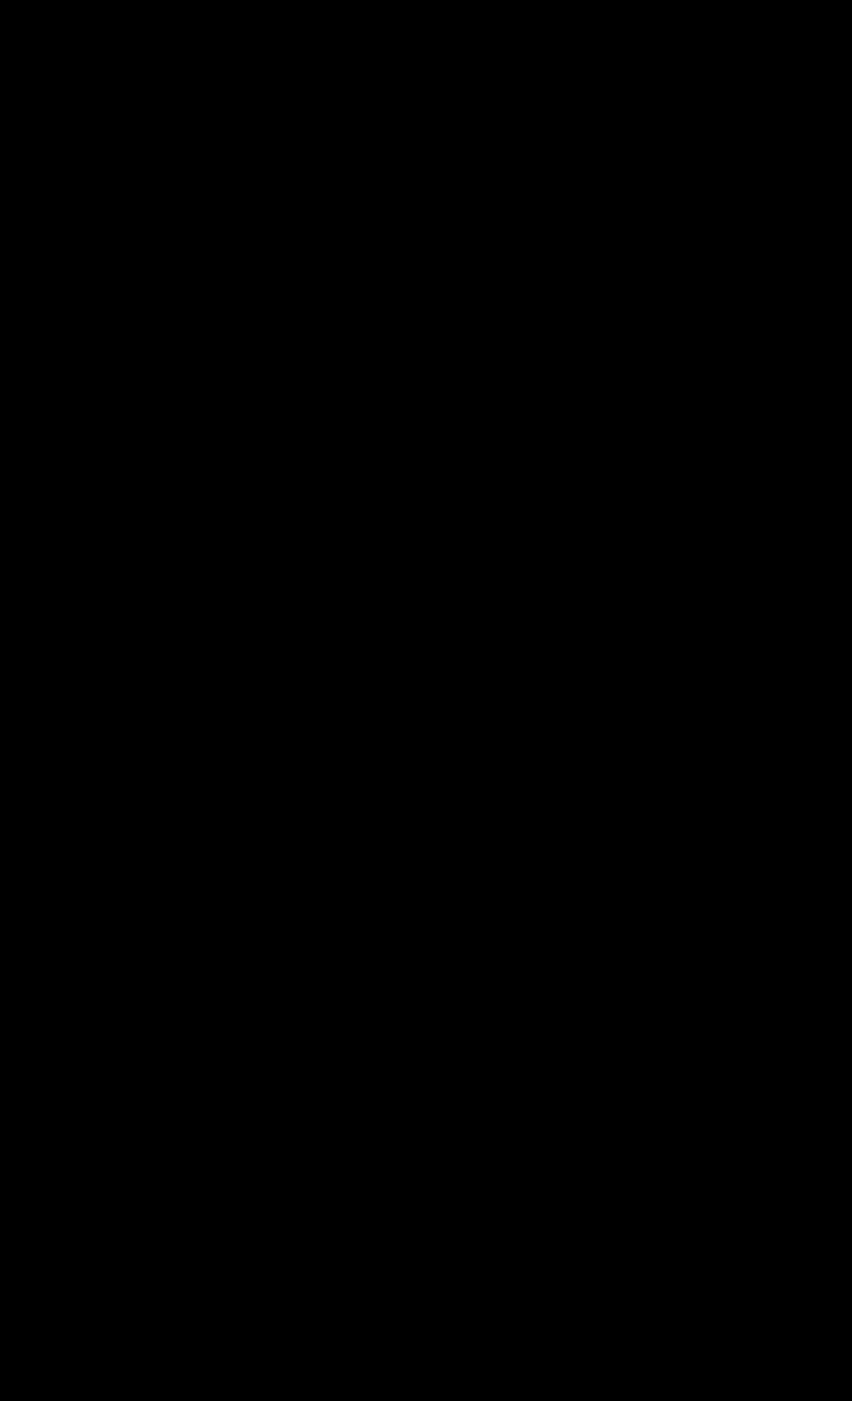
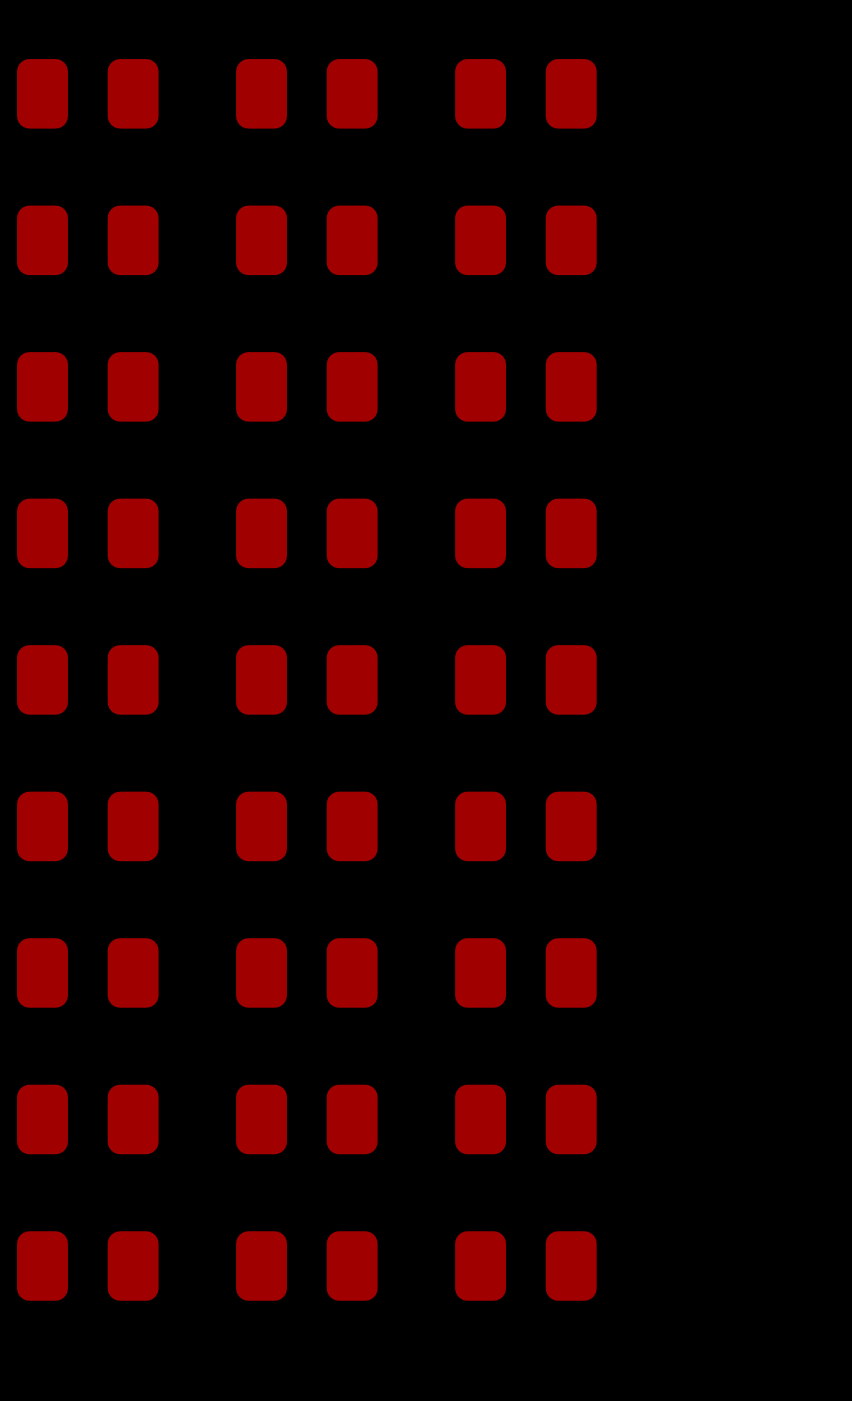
part: none -> (87, 93)
part: none -> (306, 93)
part: none -> (525, 93)
part: none -> (87, 240)
part: none -> (306, 240)
part: none -> (525, 240)
part: none -> (87, 386)
part: none -> (306, 386)
part: none -> (525, 386)
part: none -> (87, 533)
part: none -> (306, 533)
part: none -> (525, 533)
part: none -> (87, 679)
part: none -> (306, 679)
part: none -> (525, 679)
part: none -> (87, 826)
part: none -> (306, 826)
part: none -> (525, 826)
part: none -> (87, 972)
part: none -> (306, 972)
part: none -> (525, 972)
part: none -> (87, 1119)
part: none -> (306, 1119)
part: none -> (525, 1119)
part: none -> (87, 1266)
part: none -> (306, 1266)
part: none -> (525, 1266)

